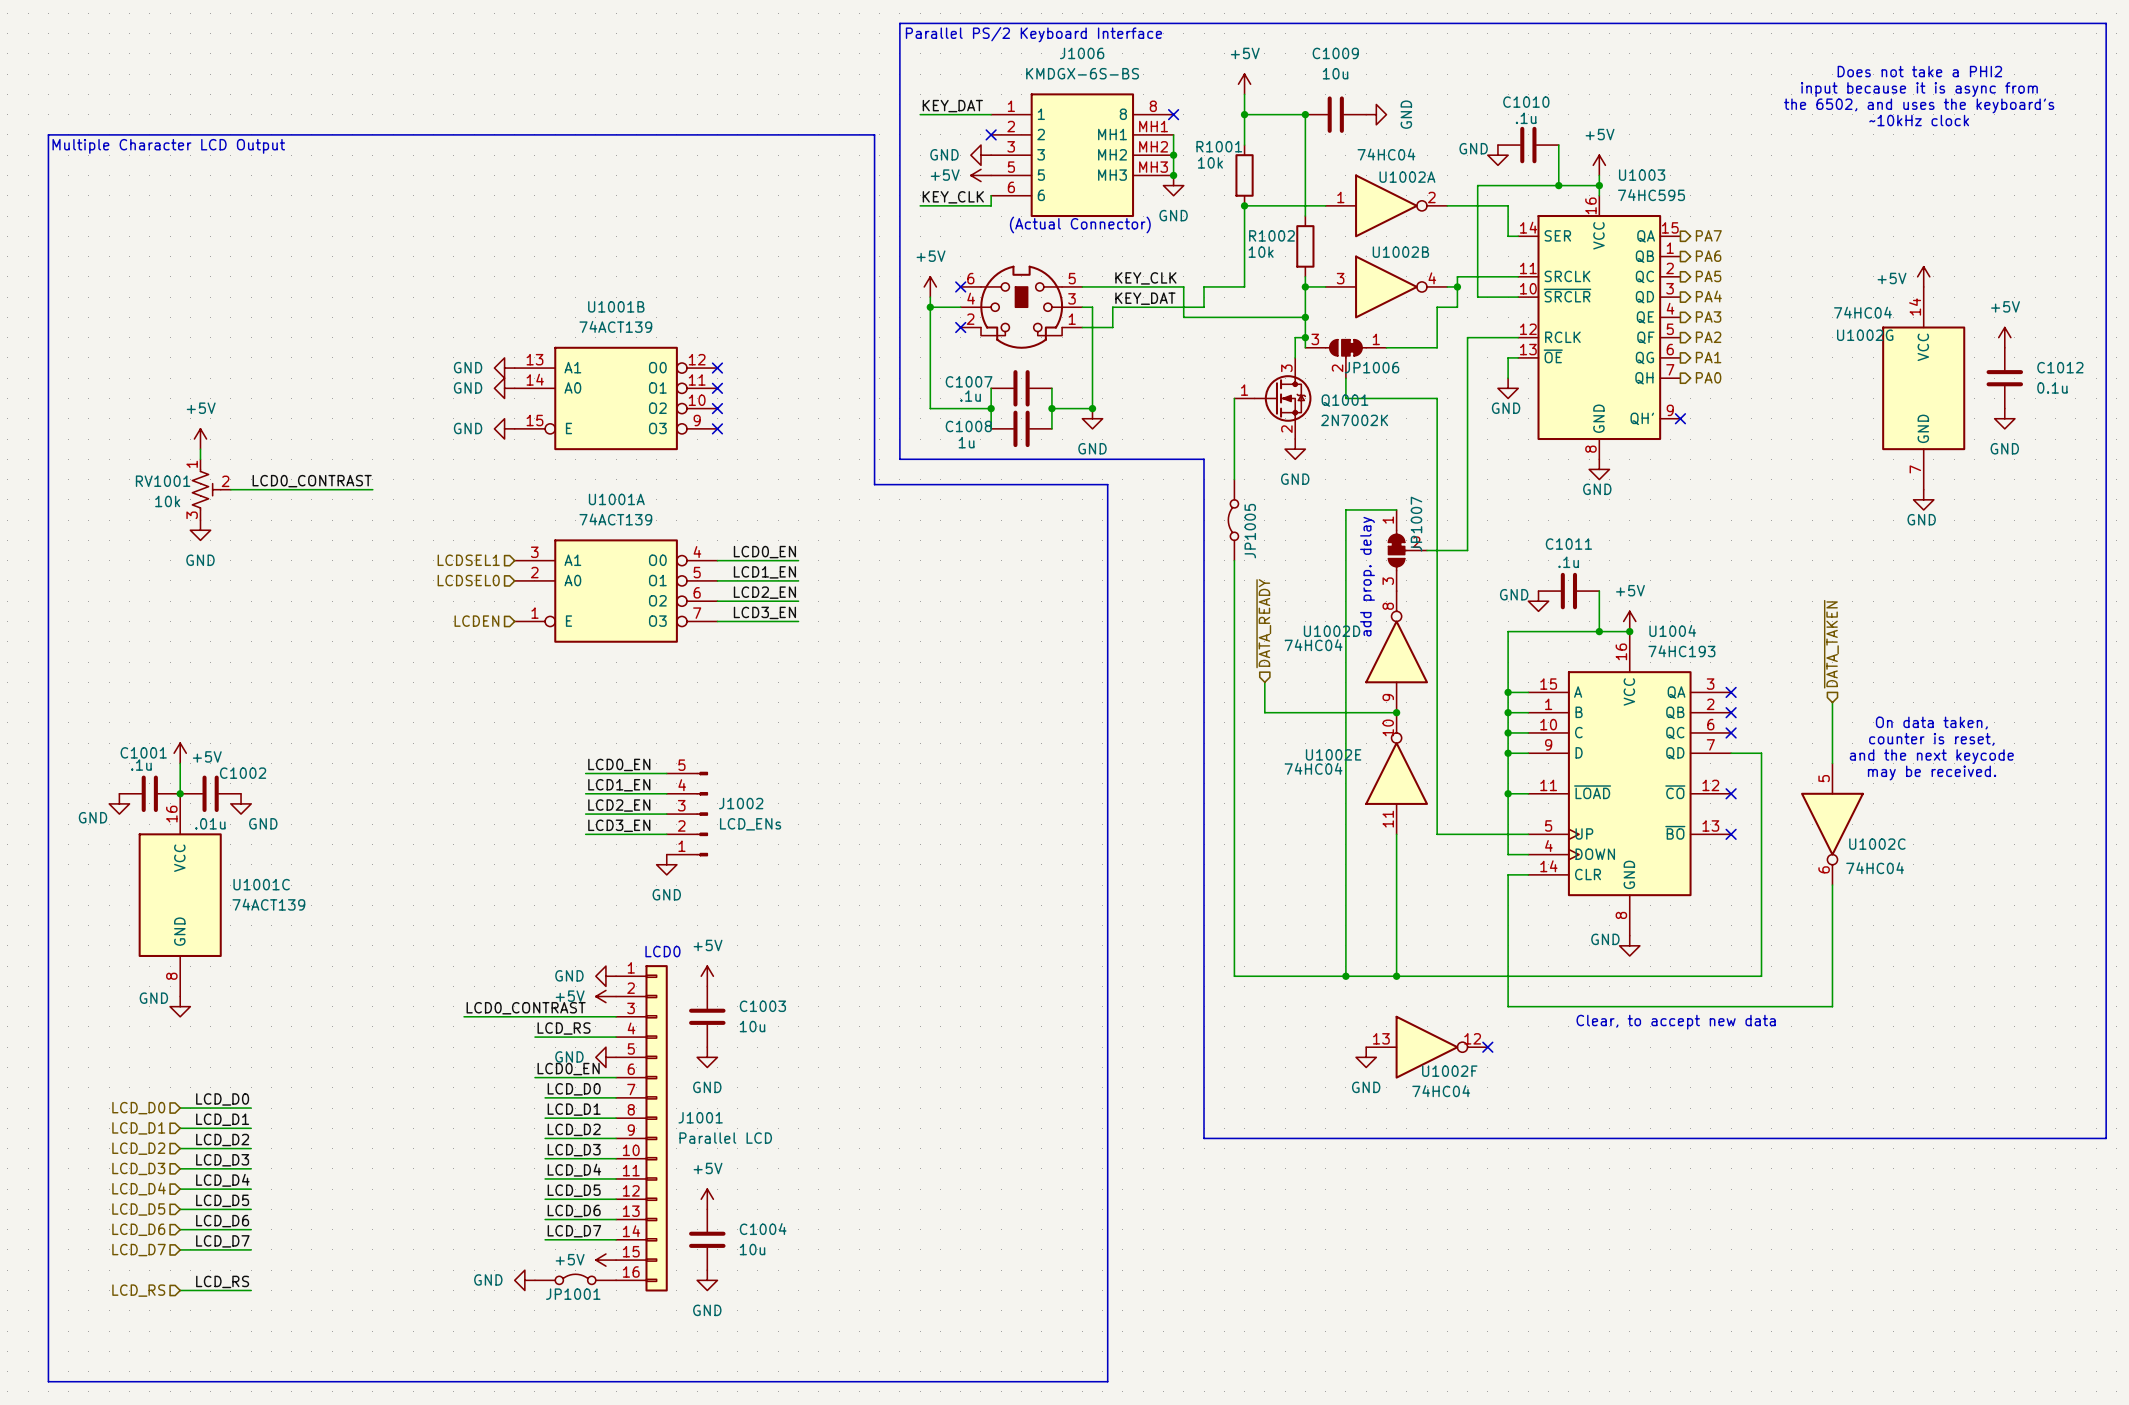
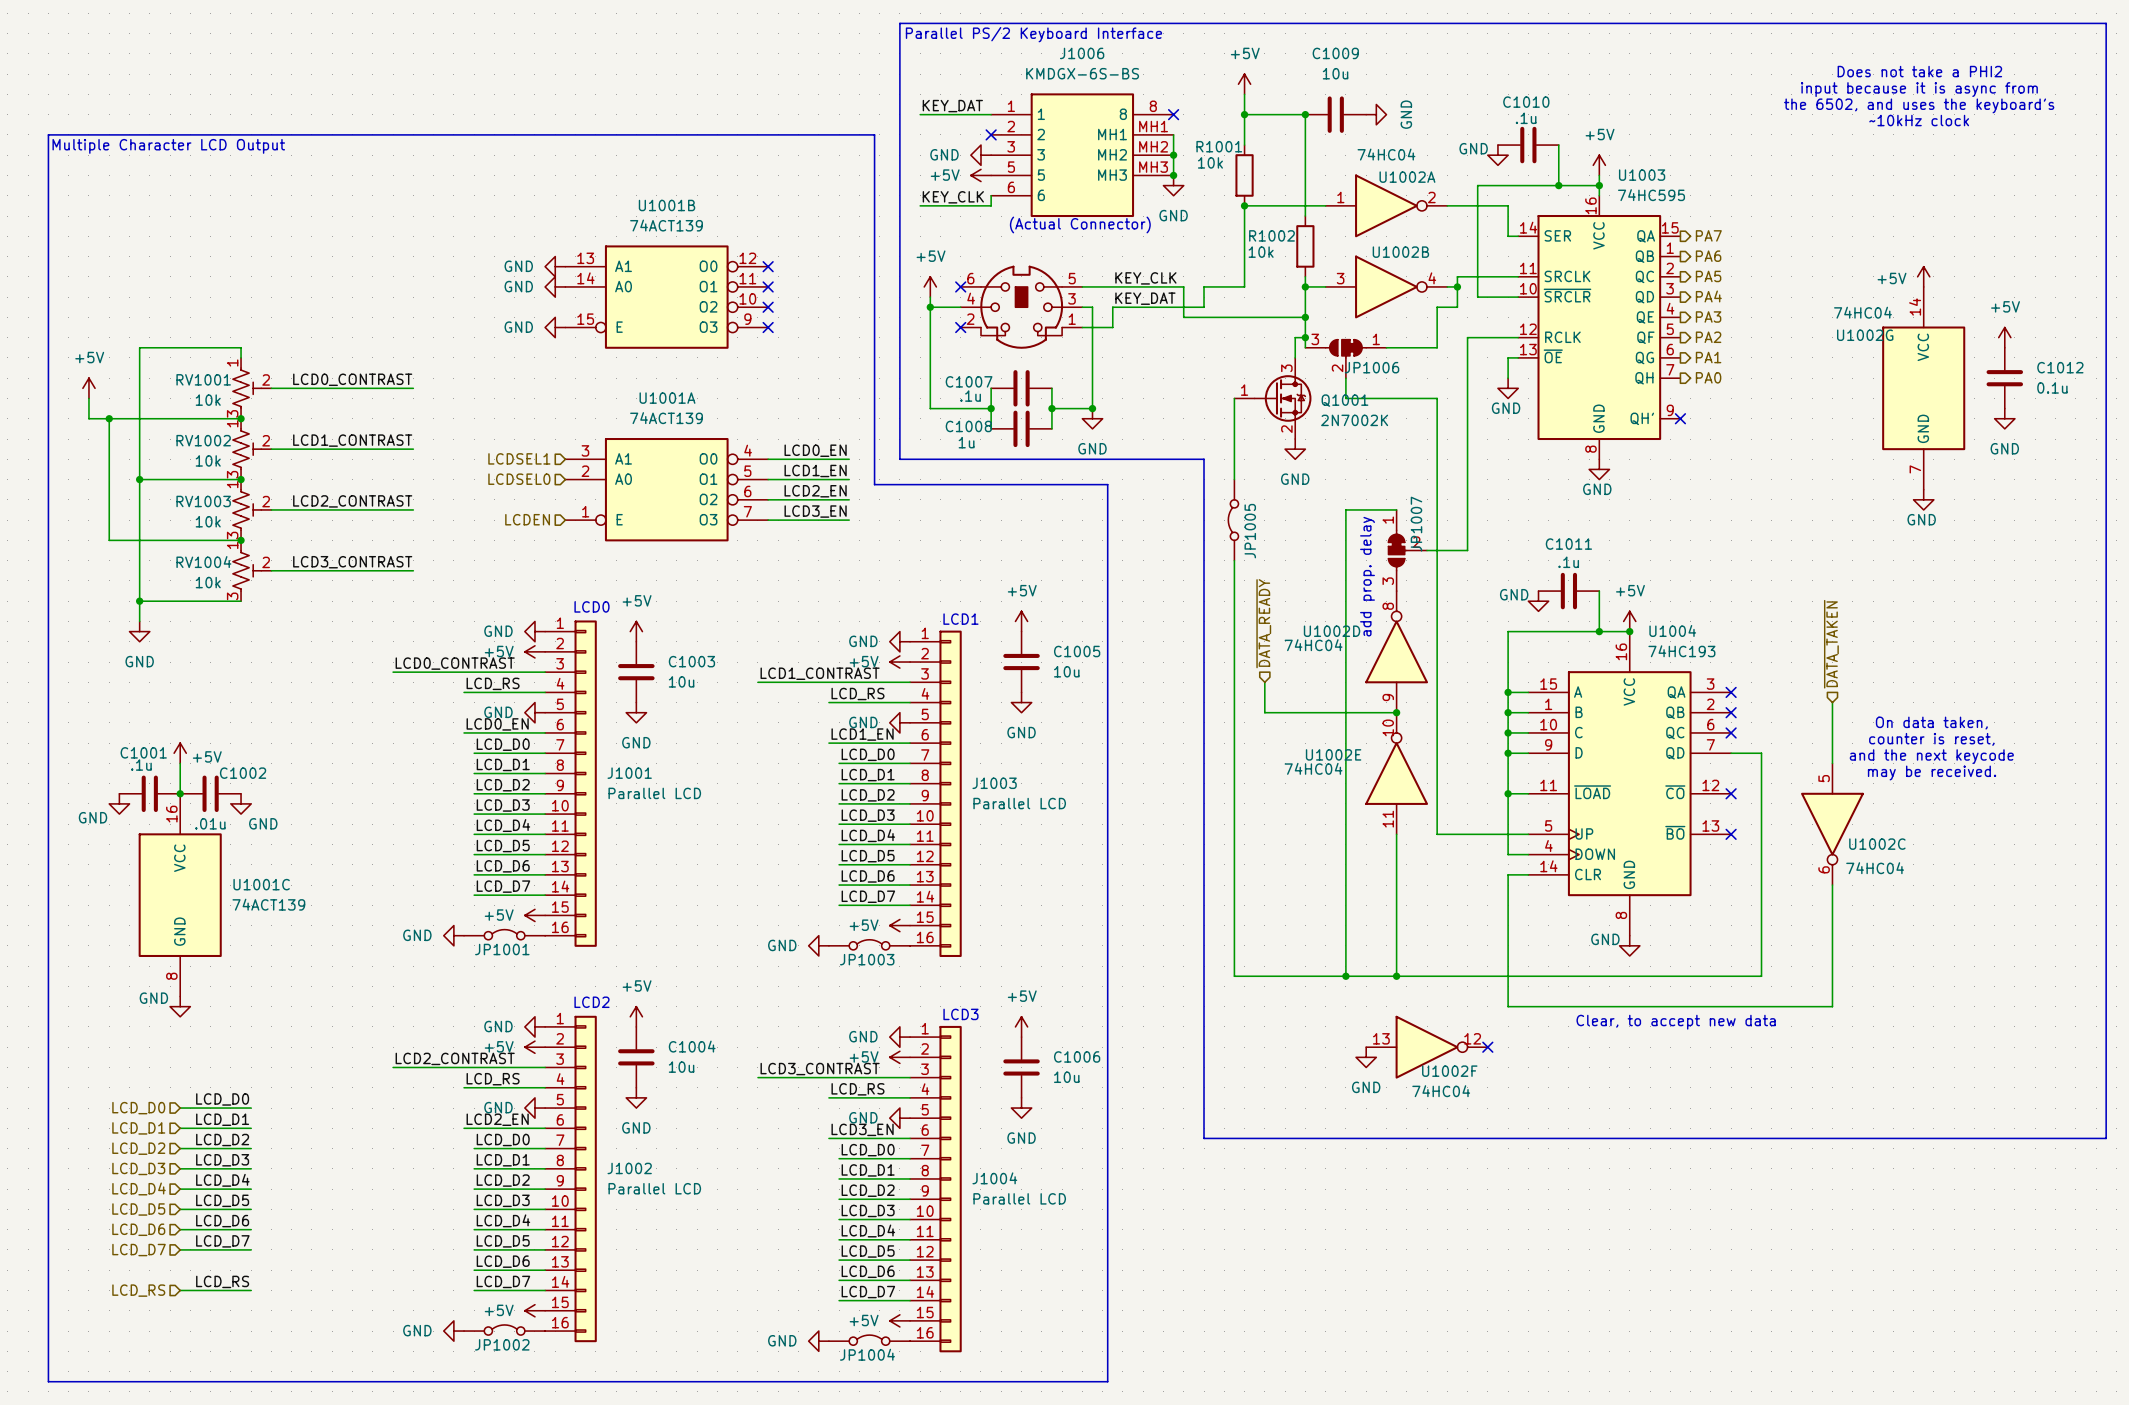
power symbol: none -> GND (555, 266)
no-connect mark: none -> (768, 266)
power symbol: none -> GND (555, 286)
no-connect mark: none -> (768, 286)
no-connect mark: none -> (768, 307)
power symbol: none -> GND (555, 327)
no-connect mark: none -> (768, 327)
wire: none -> (241, 357) (241, 347) (139, 347) (139, 621)
power symbol: GND (504, 368) -> none
no-connect mark: (717, 368) -> none
label: none -> LCD0_CONTRAST (352, 379)
wire: none -> (271, 388) (413, 388)
power symbol: GND (504, 388) -> none
no-connect mark: (717, 388) -> none
wire: none -> (88, 398) (88, 418) (241, 418)
U1001B position: (616, 398) -> (666, 297)
no-connect mark: (717, 408) -> none
wire: none -> (109, 418) (109, 540) (241, 540)
junction: none -> (109, 418)
junction: none -> (241, 418)
power symbol: GND (504, 428) -> none
no-connect mark: (717, 428) -> none
power symbol position: +5V (200, 439) -> +5V (88, 388)
label: none -> LCD1_CONTRAST (352, 440)
wire: (200, 449) (200, 459) -> none
RV1002: none -> 10k (252, 449)
wire: none -> (271, 449) (413, 449)
label: none -> LCD1_EN (815, 470)
wire: none -> (139, 479) (241, 479)
junction: none -> (139, 479)
junction: none -> (241, 479)
label: LCD0_CONTRAST (312, 481) -> LCD2_CONTRAST (352, 501)
RV1001 position: (211, 489) -> (252, 388)
wire: (230, 489) (372, 489) -> (271, 509) (413, 509)
RV1003: none -> 10k (252, 509)
power symbol position: GND (200, 530) -> GND (139, 631)
junction: none -> (241, 540)
label position: LCD0_EN (764, 552) -> LCD0_EN (815, 450)
hierarchical label position: LCDSEL1 (468, 560) -> LCDSEL1 (519, 458)
wire: (717, 560) (798, 560) -> (768, 459) (849, 459)
label: none -> LCD3_CONTRAST (352, 562)
RV1004: none -> 10k (252, 570)
wire: none -> (271, 570) (413, 570)
label: LCD1_EN (764, 572) -> none
hierarchical label position: LCDSEL0 (468, 580) -> LCDSEL0 (519, 479)
wire: (717, 580) (798, 580) -> (768, 479) (849, 479)
U1001A position: (616, 591) -> (666, 489)
label position: LCD2_EN (764, 592) -> LCD2_EN (815, 491)
wire: none -> (139, 601) (241, 601)
junction: none -> (139, 601)
wire: (717, 601) (798, 601) -> (768, 499) (849, 499)
text: none -> LCD0 (591, 606)
label position: LCD3_EN (764, 612) -> LCD3_EN (815, 511)
text: none -> LCD1 (960, 619)
hierarchical label position: LCDEN (476, 621) -> LCDEN (527, 519)
wire: (717, 621) (798, 621) -> (768, 520) (849, 520)
power symbol: none -> +5V (1021, 621)
power symbol: none -> GND (534, 631)
power symbol: none -> +5V (636, 631)
power symbol: none -> GND (899, 641)
power symbol: none -> +5V (534, 651)
power symbol: none -> +5V (899, 662)
C1005: none -> 10u (1021, 662)
label: none -> LCD0_CONTRAST (455, 663)
wire: none -> (393, 672) (545, 672)
label: none -> LCD1_CONTRAST (820, 673)
wire: none -> (757, 682) (910, 682)
label: none -> LCD_RS (493, 683)
label: none -> LCD_RS (857, 694)
wire: none -> (828, 702) (910, 702)
power symbol: none -> GND (1021, 702)
power symbol: none -> GND (534, 712)
power symbol: none -> GND (636, 712)
power symbol: none -> GND (899, 722)
label: none -> LCD1_EN (862, 734)
wire: none -> (828, 743) (910, 743)
label: none -> LCD_D0 (503, 744)
wire: none -> (474, 753) (545, 753)
label: none -> LCD_D0 (868, 754)
wire: none -> (839, 763) (910, 763)
label: none -> LCD_D1 (503, 764)
label position: LCD0_EN (619, 764) -> LCD0_EN (497, 724)
J1002 symbol: [666, 771, 708, 857] -> [545, 1015, 597, 1343]
wire: none -> (474, 773) (545, 773)
wire: (585, 773) (666, 773) -> (464, 692) (545, 692)
label: none -> LCD_D1 (868, 775)
wire: none -> (839, 783) (910, 783)
label: none -> LCD_D2 (503, 785)
label: LCD1_EN (619, 785) -> none
wire: none -> (474, 793) (545, 793)
wire: (585, 793) (666, 793) -> none
J1003: none -> Parallel LCD (935, 793)
label: none -> LCD_D2 (868, 795)
wire: none -> (839, 803) (910, 803)
label: none -> LCD_D3 (503, 805)
label: LCD2_EN (619, 805) -> none
wire: none -> (474, 814) (545, 814)
wire: (585, 814) (666, 814) -> (464, 732) (545, 732)
label: none -> LCD_D3 (868, 815)
J1002 value: LCD_ENs (750, 824) -> Parallel LCD (654, 1188)
wire: none -> (839, 824) (910, 824)
label: none -> LCD_D4 (503, 825)
label: LCD3_EN (619, 825) -> none
wire: none -> (474, 834) (545, 834)
wire: (585, 834) (666, 834) -> none
label: none -> LCD_D4 (868, 835)
wire: none -> (839, 844) (910, 844)
label: none -> LCD_D5 (503, 846)
wire: none -> (474, 854) (545, 854)
label: none -> LCD_D5 (868, 856)
power symbol: GND (666, 864) -> none
wire: none -> (839, 864) (910, 864)
label: none -> LCD_D6 (503, 866)
wire: none -> (474, 874) (545, 874)
label: none -> LCD_D6 (868, 876)
wire: none -> (839, 885) (910, 885)
label: none -> LCD_D7 (503, 886)
wire: none -> (474, 895) (545, 895)
label: none -> LCD_D7 (868, 896)
wire: none -> (839, 905) (910, 905)
power symbol: none -> +5V (534, 915)
power symbol: none -> +5V (899, 925)
power symbol: none -> GND (453, 935)
JP1003: none -> (869, 944)
power symbol: none -> GND (818, 945)
text: LCD0 (662, 951) -> none
power symbol: GND (605, 976) -> none
power symbol: +5V (707, 976) -> none
power symbol rotation: 0° (605, 996) -> 90° clockwise (636, 1016)
power symbol position: +5V (605, 996) -> +5V (636, 1016)
text: none -> LCD2 (591, 1002)
label: LCD0_CONTRAST (526, 1008) -> none
text: none -> LCD3 (960, 1014)
wire: (464, 1016) (616, 1016) -> (393, 1067) (545, 1067)
C1003 position: (707, 1016) -> (636, 672)
power symbol: none -> GND (534, 1026)
power symbol: none -> +5V (1021, 1026)
label position: LCD_RS (564, 1028) -> LCD_RS (493, 1079)
wire: (534, 1037) (616, 1037) -> (464, 1087) (545, 1087)
power symbol: none -> GND (899, 1037)
power symbol: none -> +5V (534, 1047)
power symbol: GND (605, 1057) -> none
power symbol: GND (707, 1057) -> none
power symbol: none -> +5V (899, 1057)
label: none -> LCD2_CONTRAST (455, 1058)
C1006: none -> 10u (1021, 1067)
label: LCD0_EN (568, 1069) -> none
label: none -> LCD3_CONTRAST (820, 1069)
wire: (534, 1077) (616, 1077) -> (464, 1128) (545, 1128)
wire: none -> (757, 1077) (910, 1077)
label position: LCD_D0 (574, 1089) -> LCD_D0 (503, 1140)
label: none -> LCD_RS (857, 1089)
wire: (545, 1097) (616, 1097) -> (474, 1148) (545, 1148)
power symbol: none -> GND (636, 1097)
wire: none -> (828, 1097) (910, 1097)
power symbol: none -> GND (534, 1108)
power symbol: none -> GND (1021, 1108)
label position: LCD_D1 (574, 1109) -> LCD_D1 (503, 1160)
wire: (545, 1118) (616, 1118) -> (474, 1168) (545, 1168)
power symbol: none -> GND (899, 1118)
label: none -> LCD2_EN (497, 1119)
J1001 position: (641, 1128) -> (570, 783)
label position: LCD_D2 (574, 1129) -> LCD_D2 (503, 1180)
label: none -> LCD3_EN (862, 1129)
wire: (545, 1138) (616, 1138) -> (474, 1189) (545, 1189)
wire: none -> (828, 1138) (910, 1138)
label position: LCD_D3 (574, 1150) -> LCD_D3 (503, 1200)
label: none -> LCD_D0 (868, 1150)
wire: (545, 1158) (616, 1158) -> (474, 1209) (545, 1209)
wire: none -> (839, 1158) (910, 1158)
label position: LCD_D4 (574, 1170) -> LCD_D4 (503, 1220)
label: none -> LCD_D1 (868, 1170)
wire: (545, 1178) (616, 1178) -> (474, 1229) (545, 1229)
wire: none -> (839, 1178) (910, 1178)
J1004: none -> Parallel LCD (935, 1189)
label position: LCD_D5 (574, 1190) -> LCD_D5 (503, 1241)
label: none -> LCD_D2 (868, 1190)
wire: (545, 1199) (616, 1199) -> (474, 1249) (545, 1249)
power symbol: +5V (707, 1199) -> none
wire: none -> (839, 1199) (910, 1199)
label position: LCD_D6 (574, 1210) -> LCD_D6 (503, 1261)
label: none -> LCD_D3 (868, 1210)
wire: (545, 1219) (616, 1219) -> (474, 1270) (545, 1270)
wire: none -> (839, 1219) (910, 1219)
label: none -> LCD_D4 (868, 1230)
label position: LCD_D7 (574, 1231) -> LCD_D7 (503, 1281)
wire: (545, 1239) (616, 1239) -> (474, 1290) (545, 1290)
C1004 position: (707, 1239) -> (636, 1057)
wire: none -> (839, 1239) (910, 1239)
label: none -> LCD_D5 (868, 1251)
power symbol position: +5V (605, 1260) -> +5V (534, 1310)
wire: none -> (839, 1260) (910, 1260)
label: none -> LCD_D6 (868, 1271)
JP1001 position: (575, 1279) -> (504, 934)
power symbol: GND (524, 1280) -> none
power symbol: GND (707, 1280) -> none
wire: none -> (839, 1280) (910, 1280)
label: none -> LCD_D7 (868, 1292)
wire: none -> (839, 1300) (910, 1300)
power symbol: none -> +5V (899, 1320)
JP1002: none -> (504, 1330)
power symbol: none -> GND (453, 1331)
JP1004: none -> (869, 1340)
power symbol: none -> GND (818, 1341)

